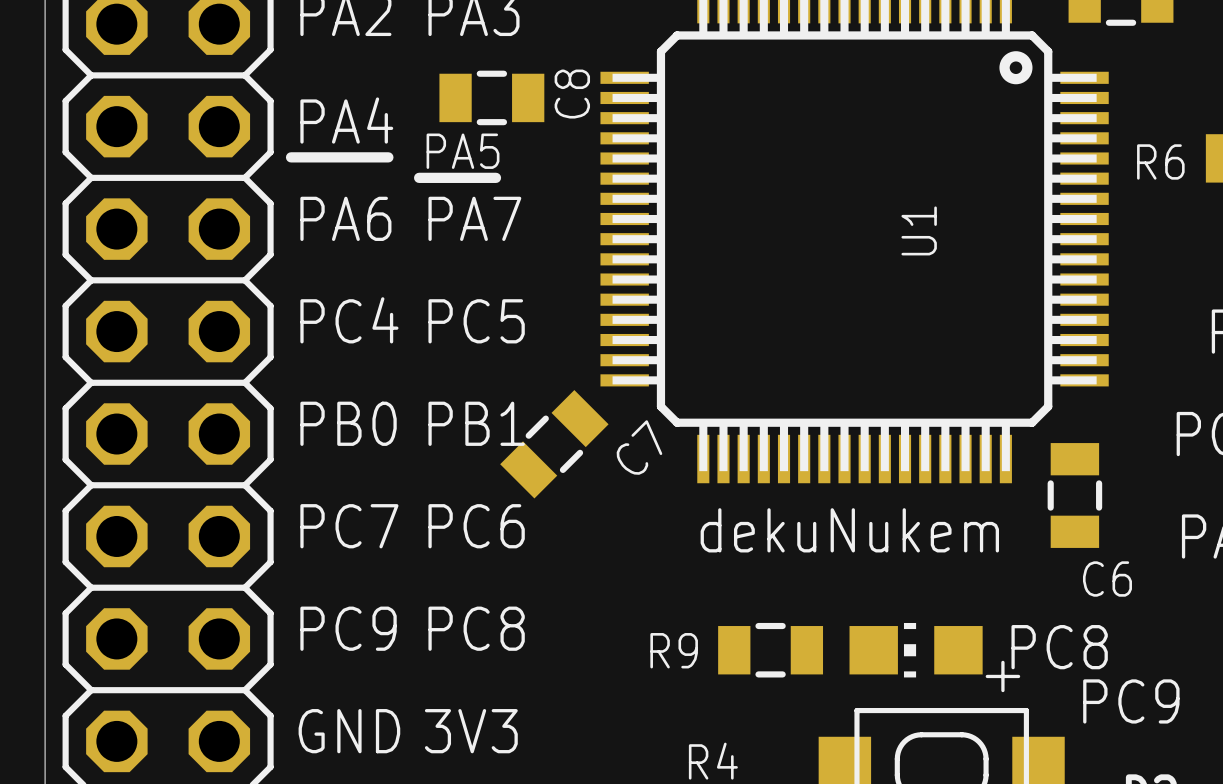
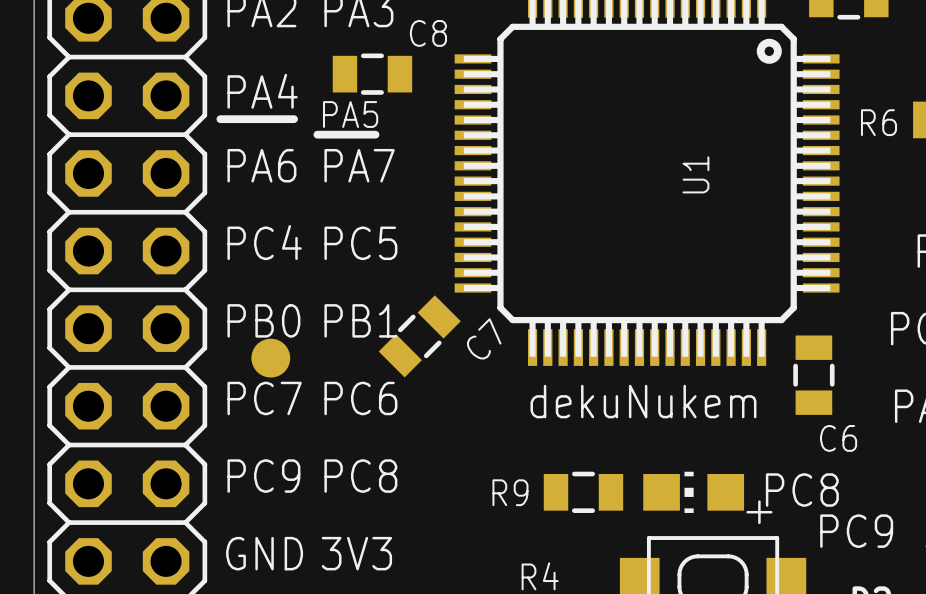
C8 name rotation: 0° (572, 94) -> 90° clockwise (428, 33)
part: none -> (270, 358)

